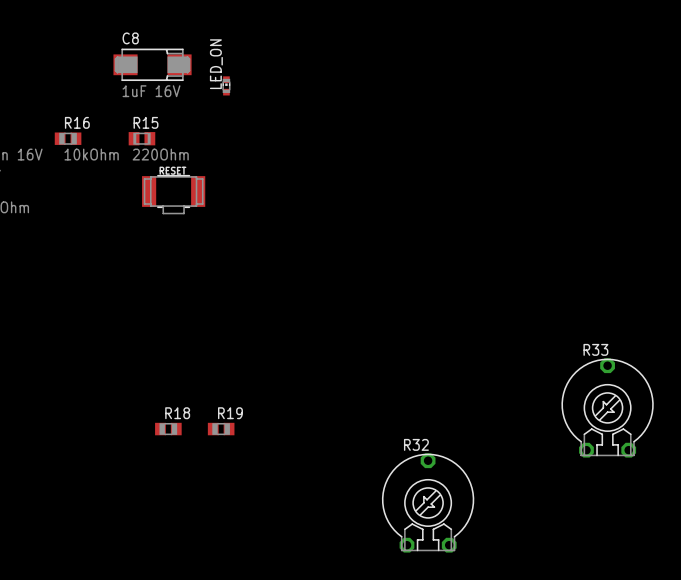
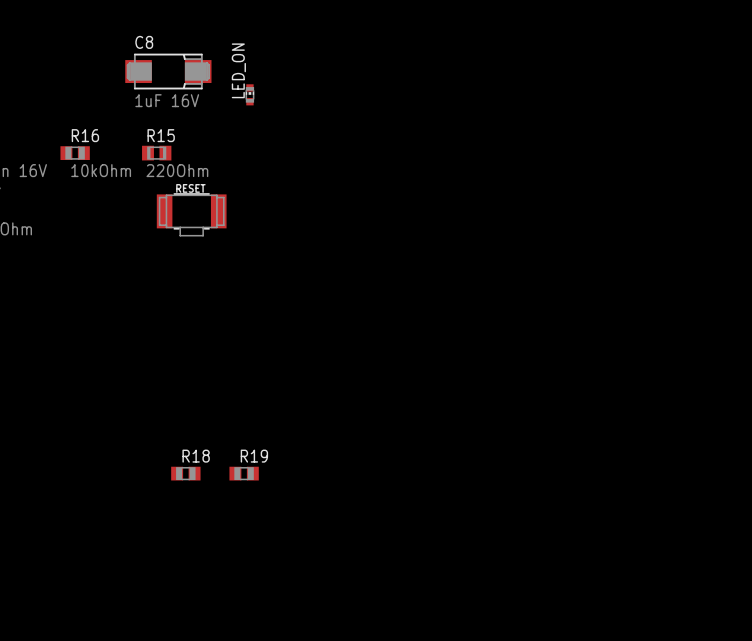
R33: (607, 407) -> none
R32: (428, 502) -> none

